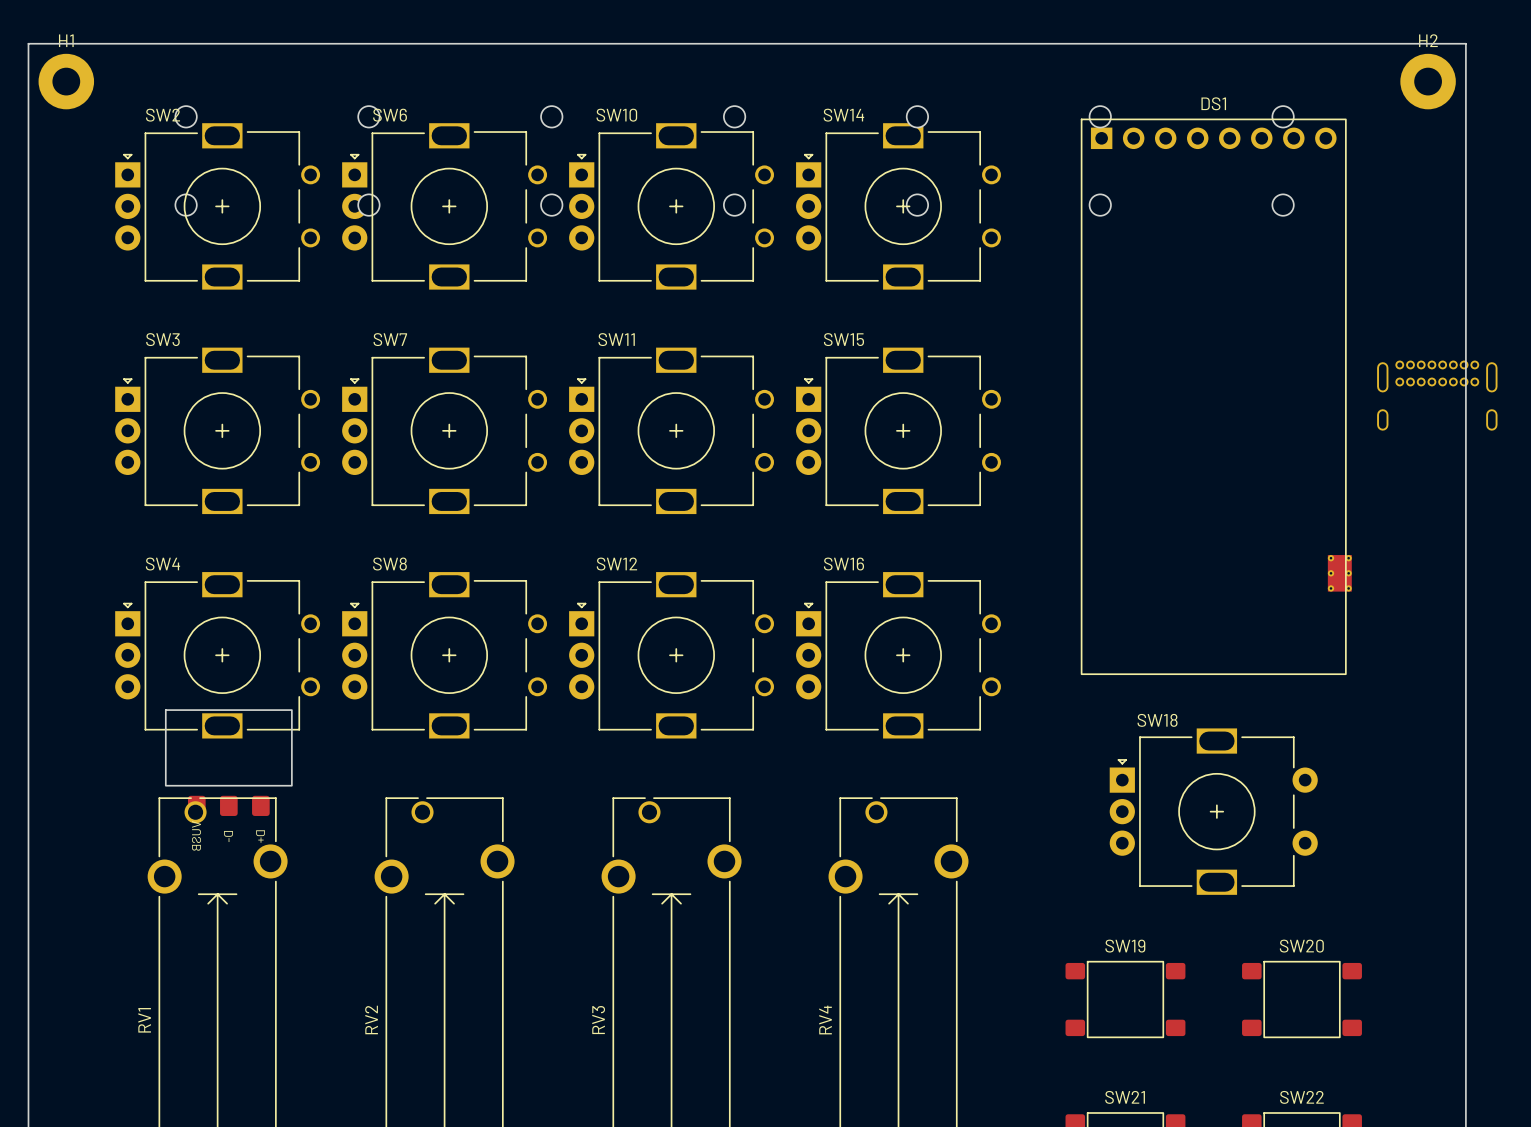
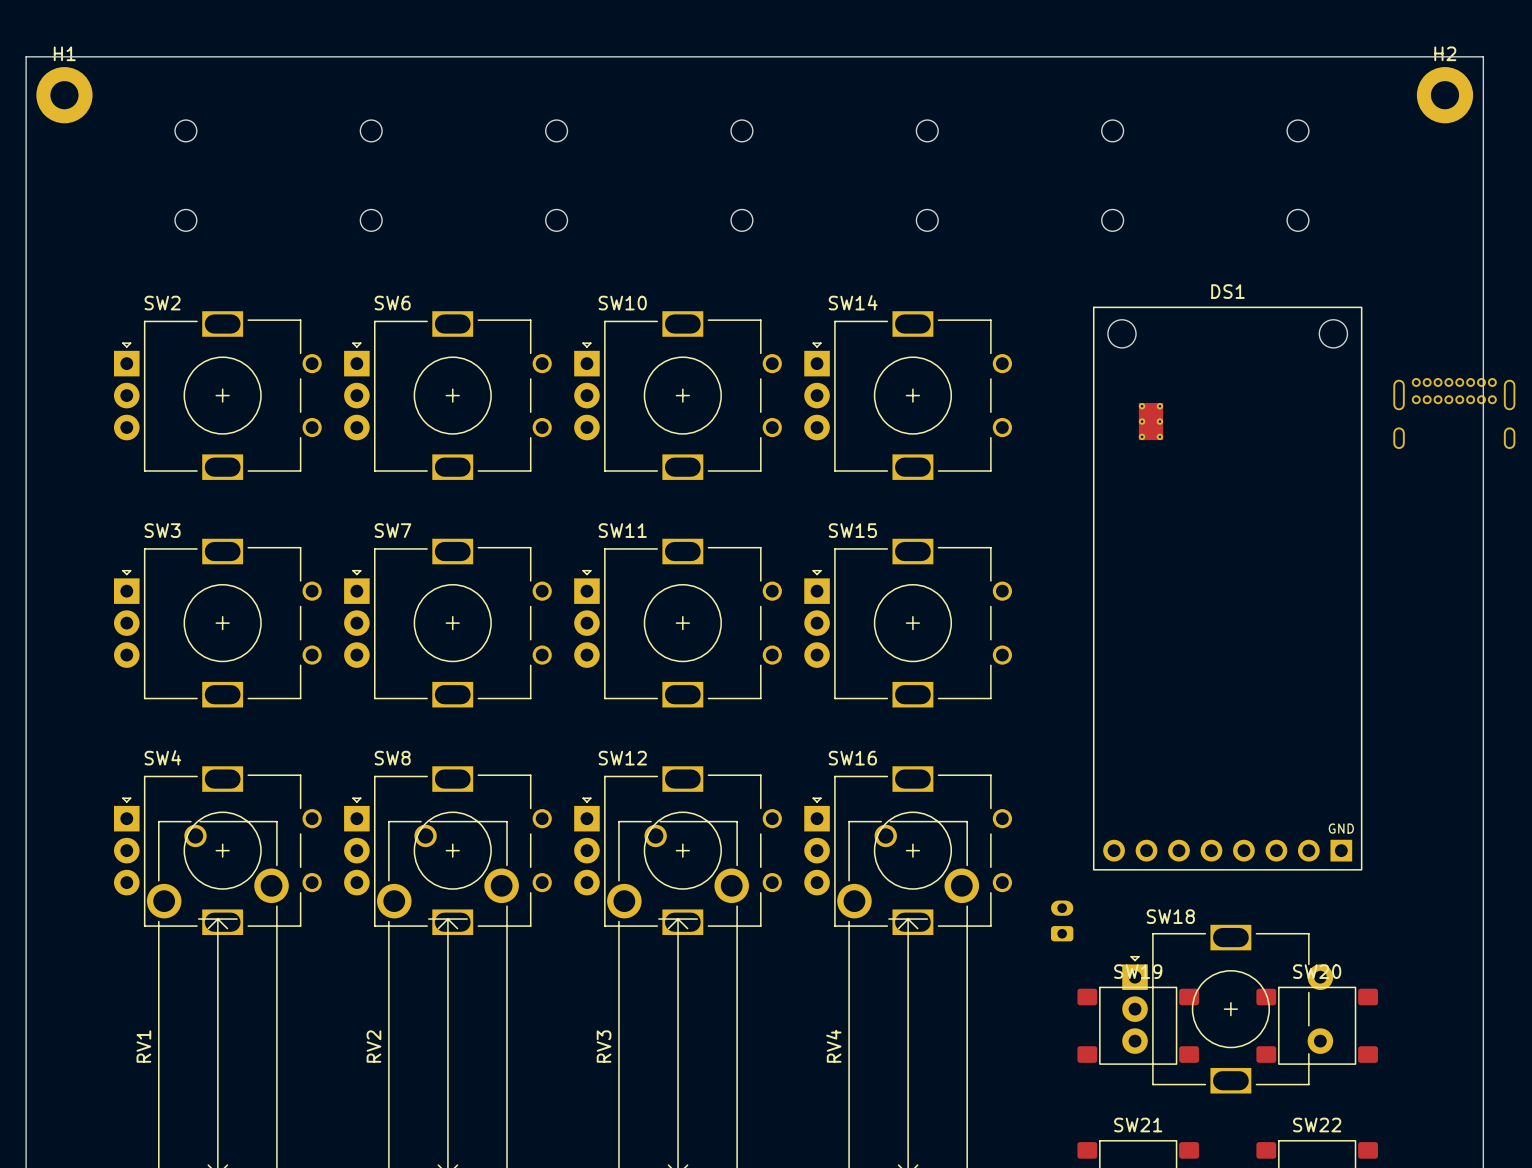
DS1 footprint: [1080, 118, 1347, 675] -> [1092, 306, 1363, 871]
SW2 position: (217, 206) -> (217, 395)
SW6 position: (444, 206) -> (447, 395)
SW10 position: (671, 206) -> (678, 395)
SW14 position: (898, 206) -> (908, 395)
SW3 position: (217, 430) -> (217, 623)
SW7 position: (444, 430) -> (447, 623)
SW11 position: (671, 430) -> (678, 623)
SW15 position: (898, 430) -> (908, 623)
part position: (1339, 573) -> (1150, 421)
SW4 position: (217, 655) -> (217, 850)
SW8 position: (444, 655) -> (447, 850)
SW12 position: (671, 655) -> (678, 850)
SW16 position: (898, 655) -> (908, 850)
part: (228, 762) -> none
SW18 position: (1213, 811) -> (1227, 1009)
part: none -> (1062, 920)

